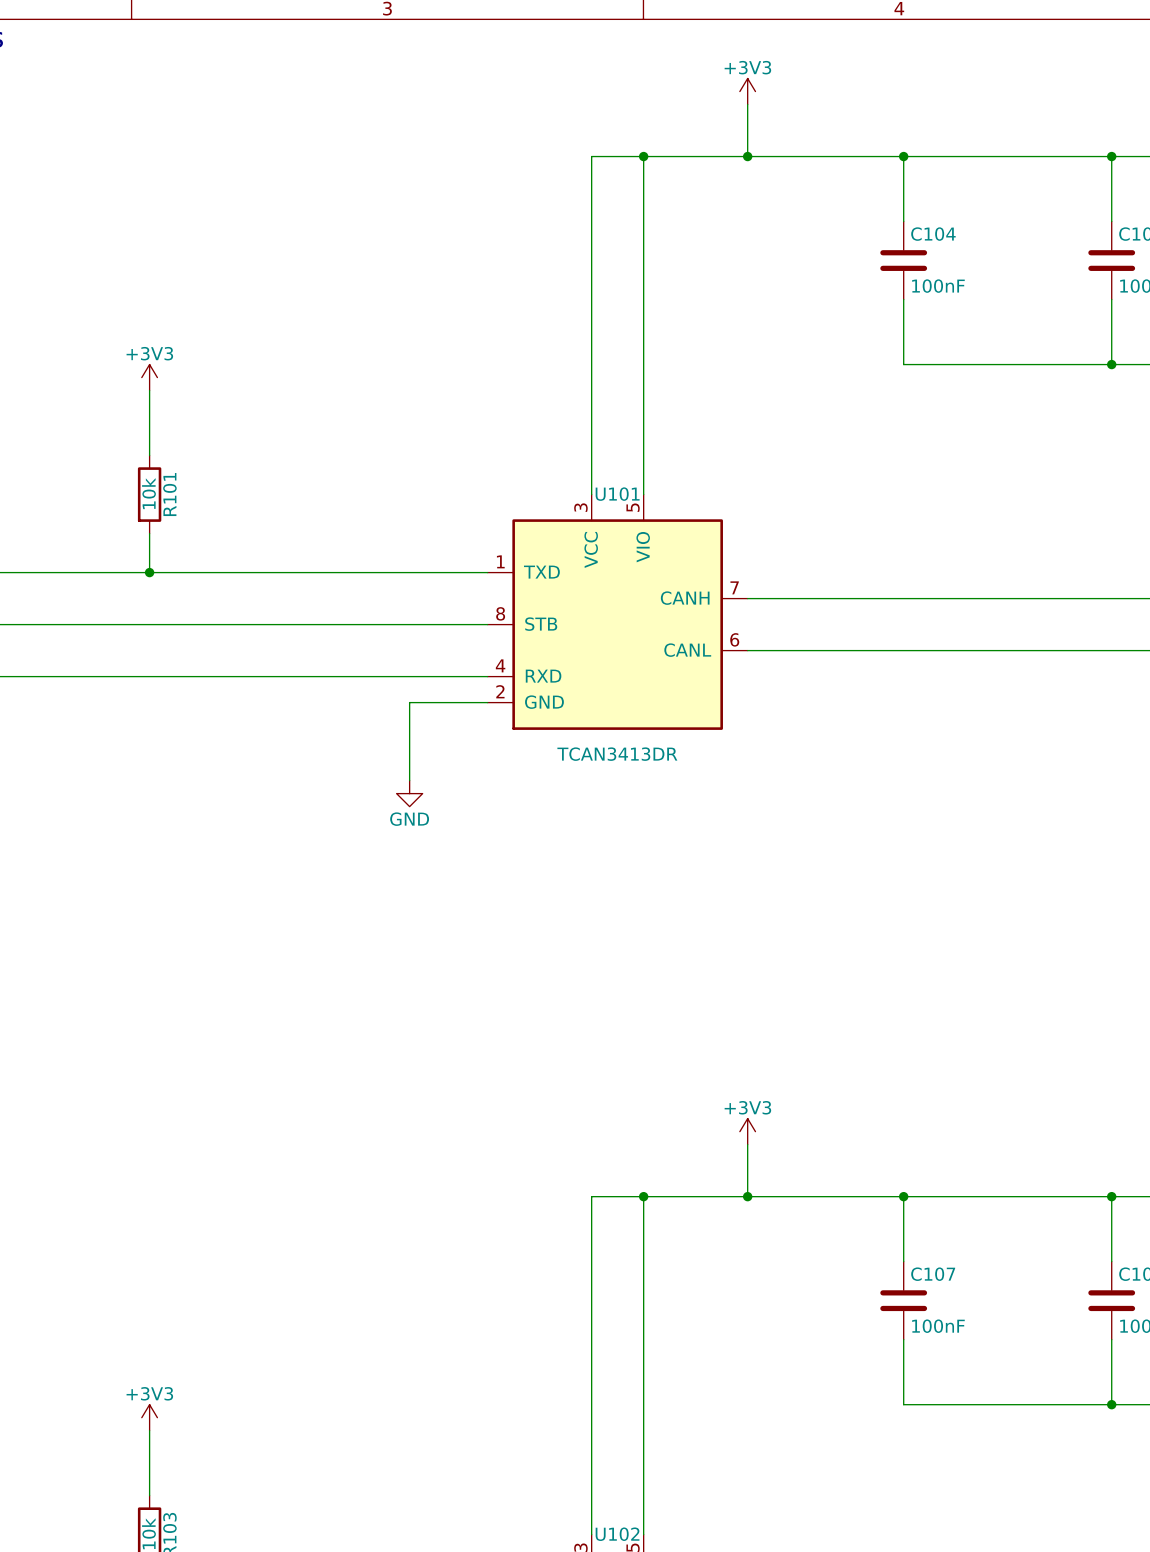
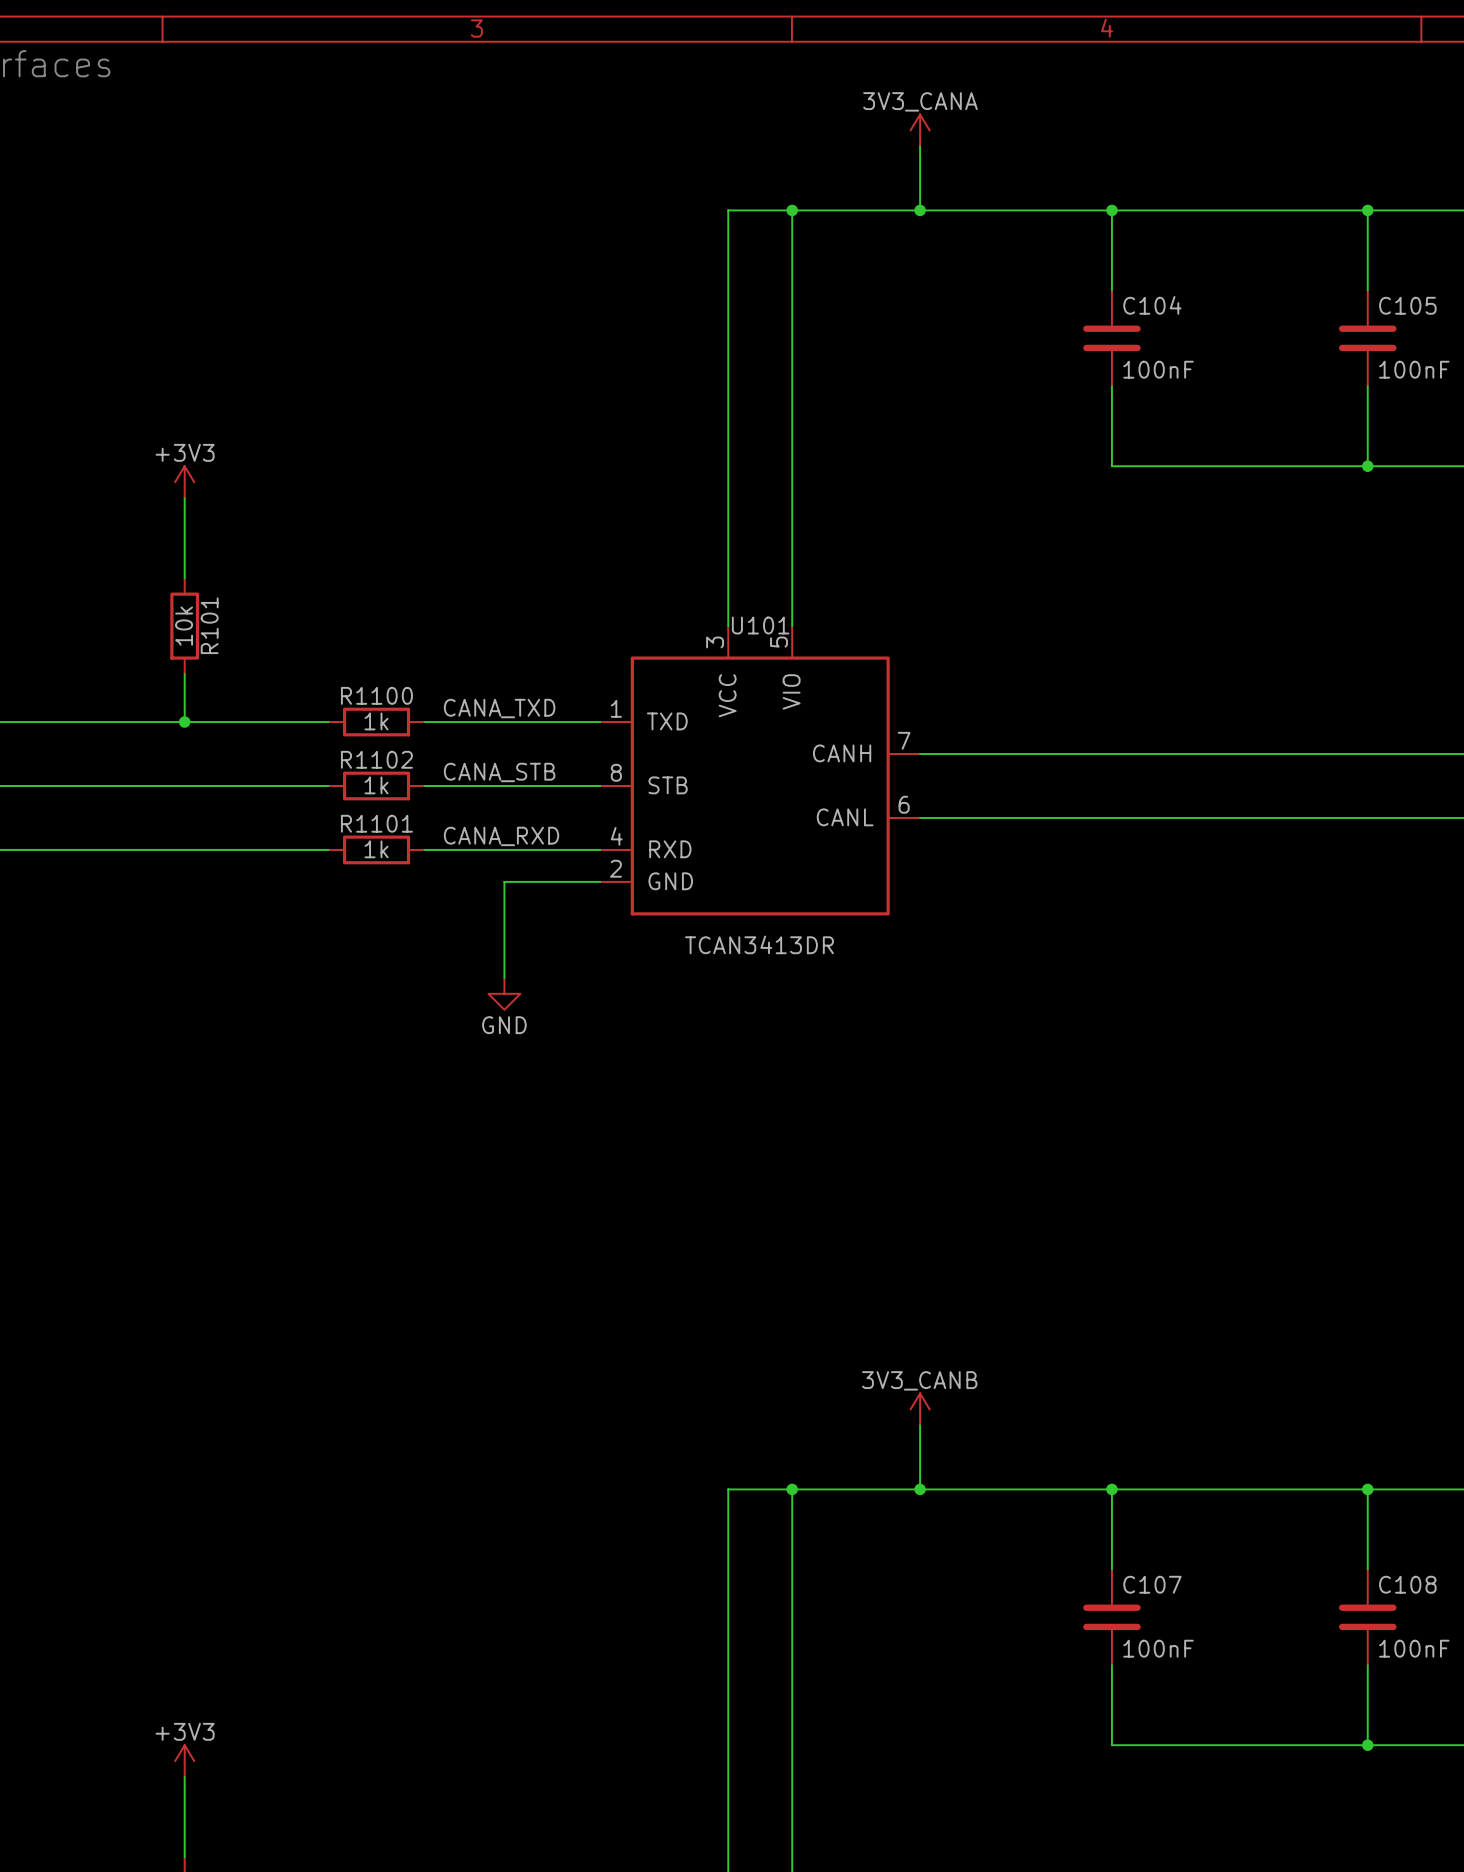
power symbol: +3V3 (747, 91) -> 3V3_CANA (920, 130)
label: none -> CANA_TXD (499, 708)
wire: (266, 572) (344, 572) -> none
R1100: none -> 1k (376, 722)
label: none -> CANA_STB (499, 772)
wire: (266, 624) (344, 624) -> none
R1102: none -> 1k (376, 785)
label: none -> CANA_RXD (501, 836)
wire: (266, 676) (344, 676) -> none
R1101: none -> 1k (376, 849)
power symbol: +3V3 (747, 1131) -> 3V3_CANB (920, 1409)

